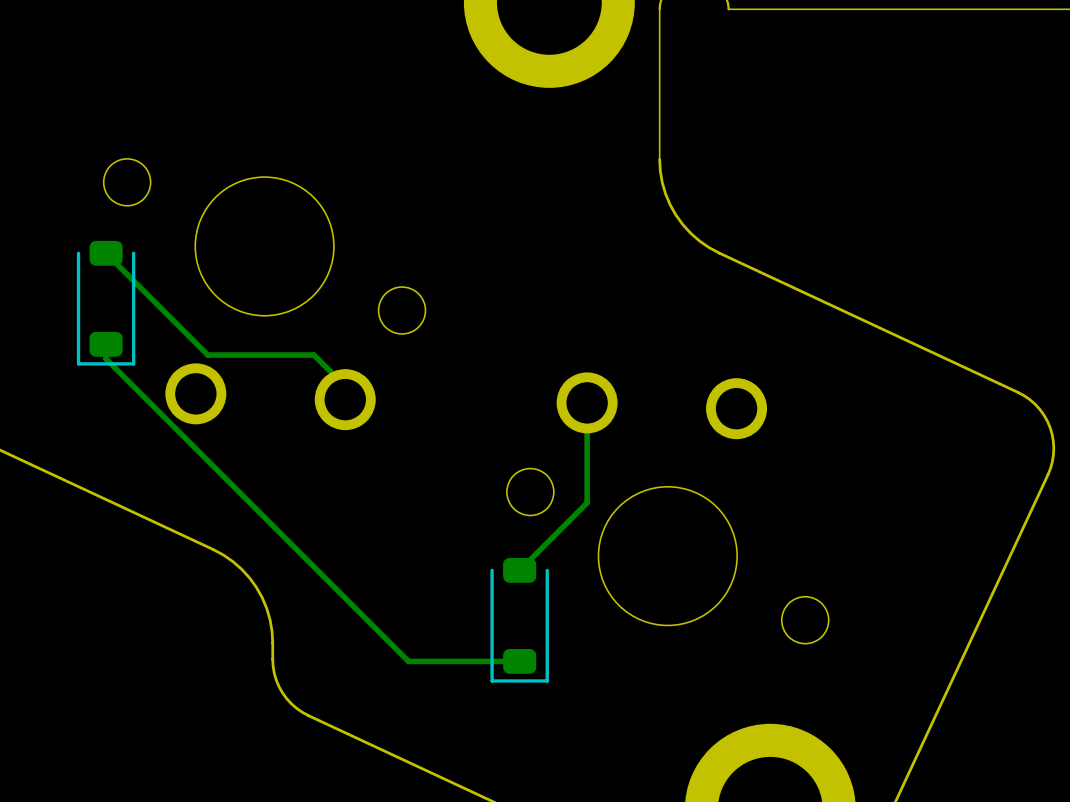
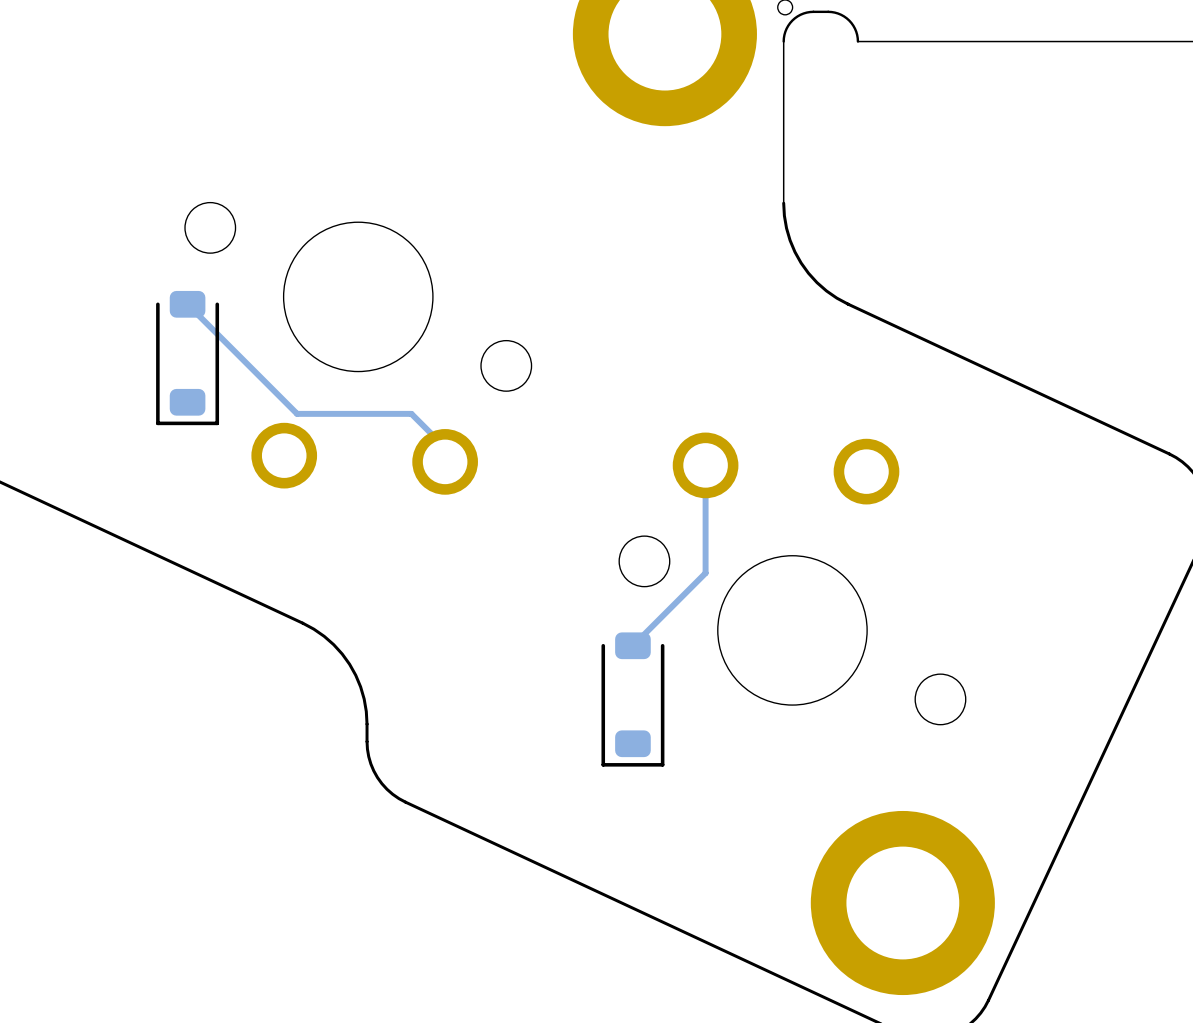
track: (106, 344) (106, 358) (408, 661) (519, 661) -> none

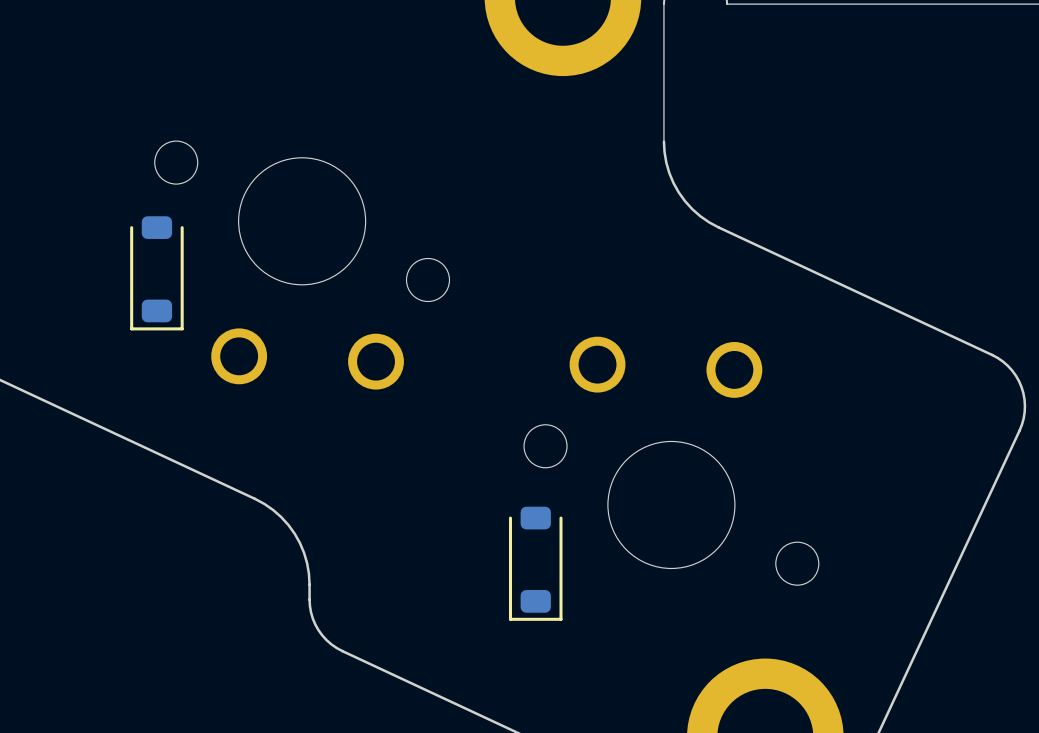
track: (187, 304) (297, 413) (411, 413) (454, 457) -> none
track: (705, 465) (705, 573) (632, 645) -> none

